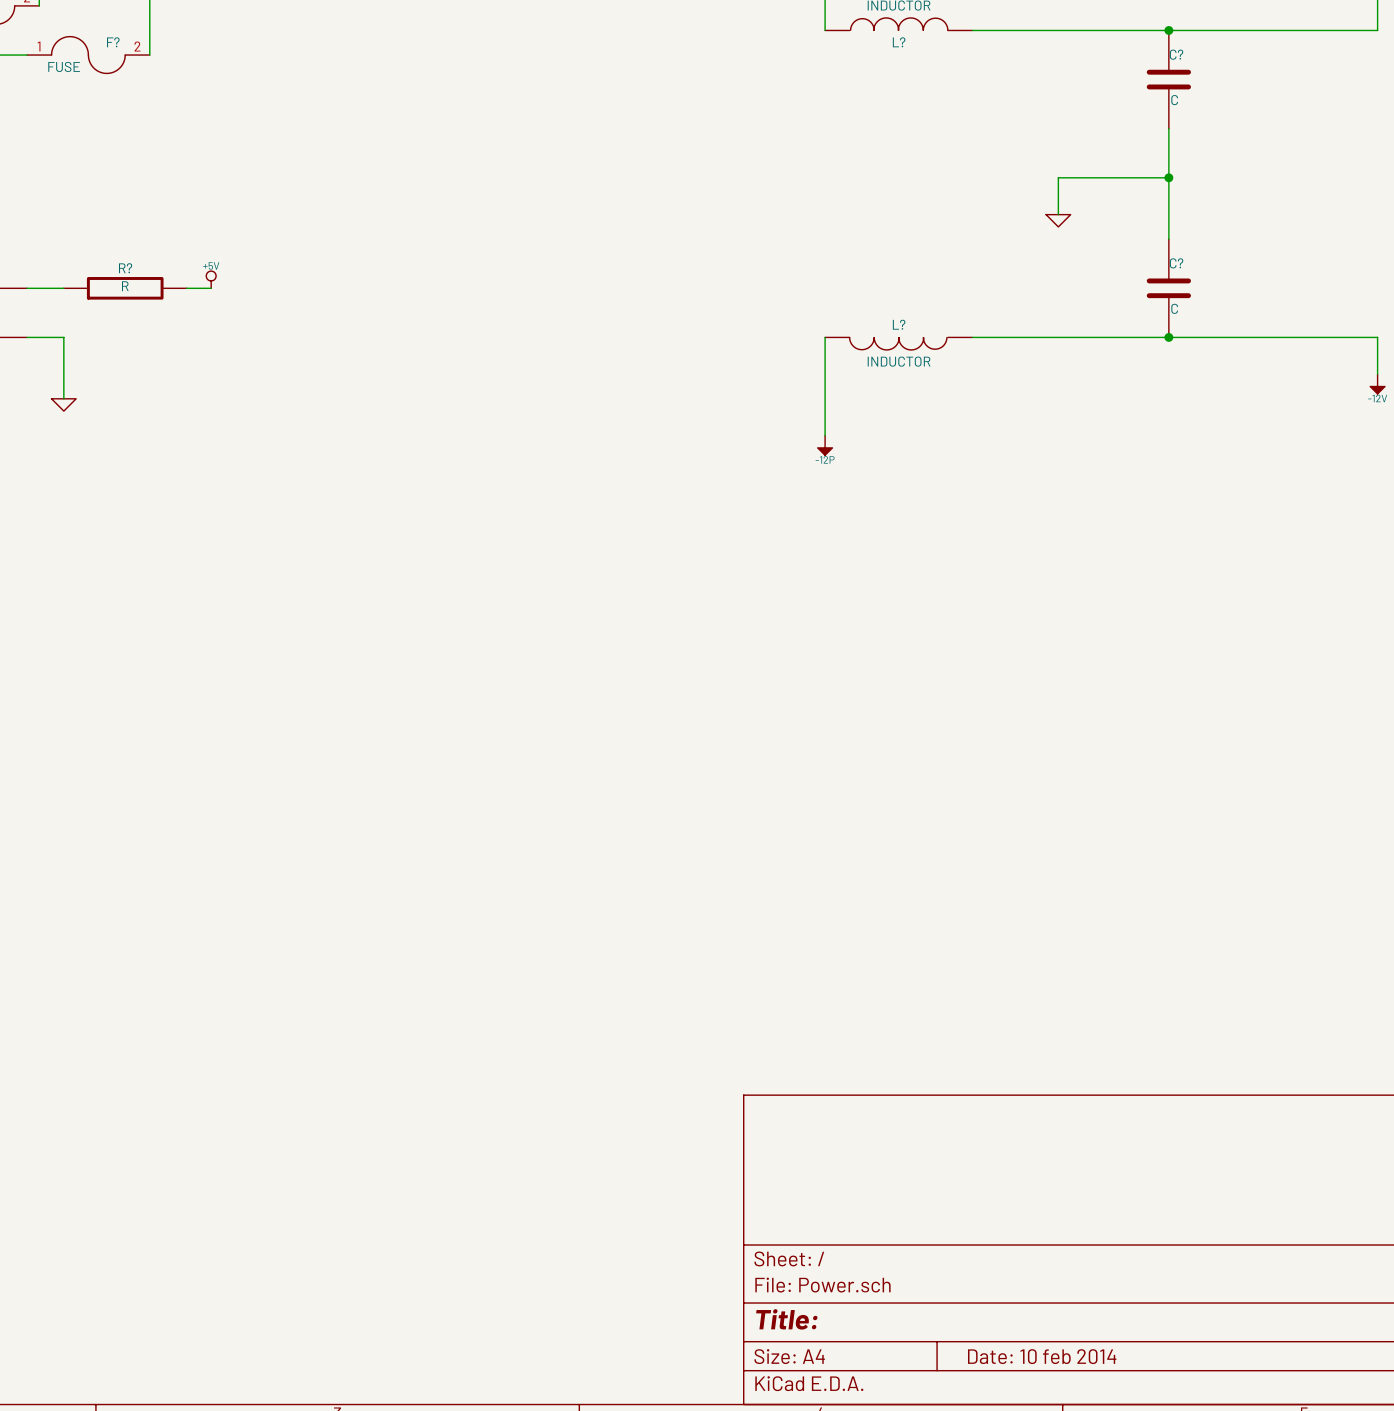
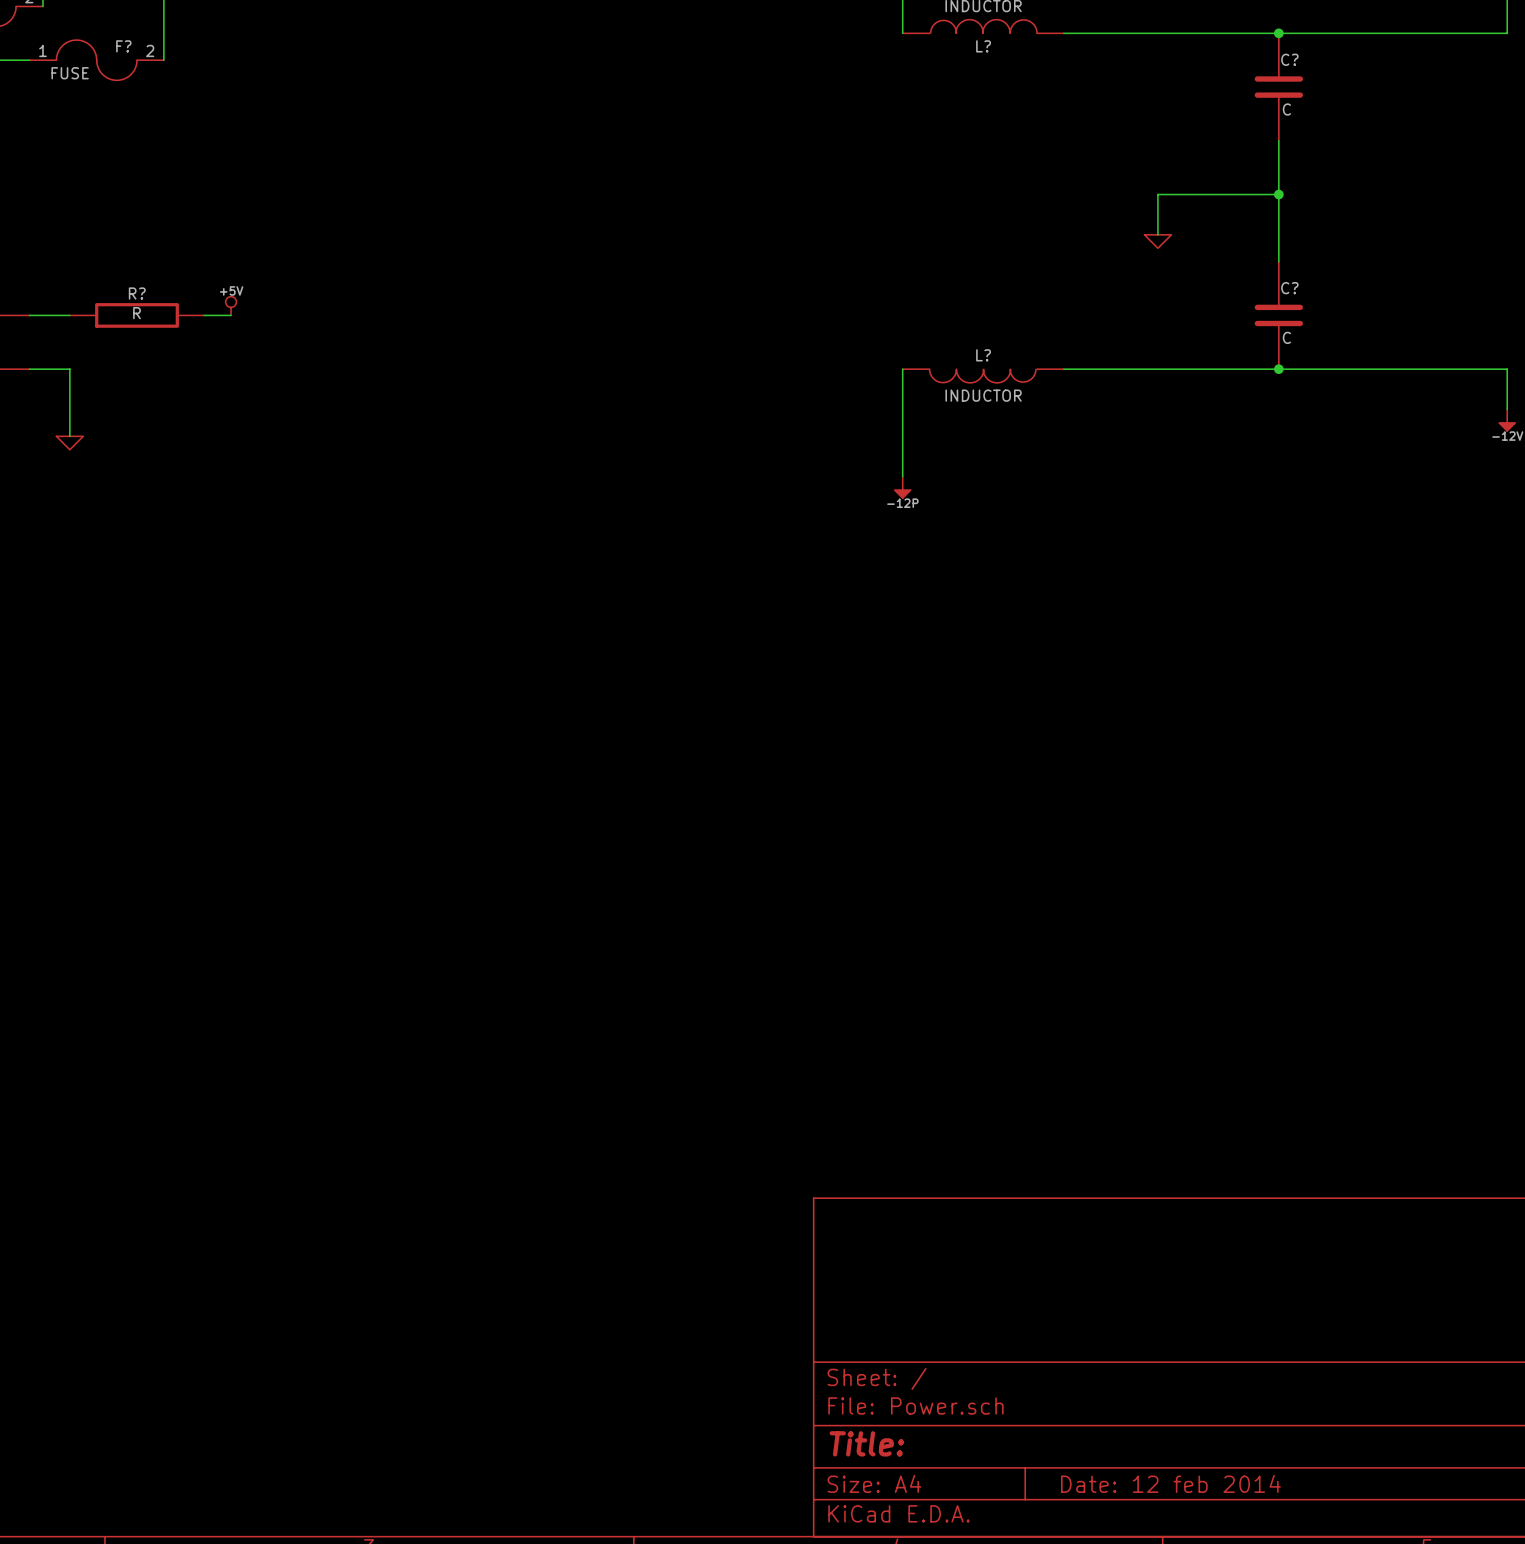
title block: Date: 10 feb 2014 (1042, 1356) -> Date: 12 feb 2014 (1170, 1483)

